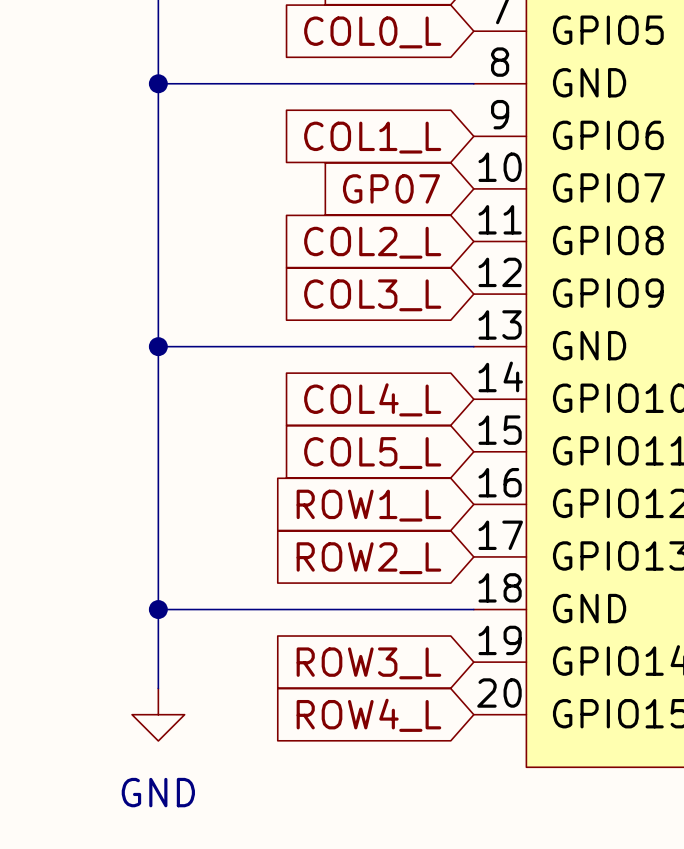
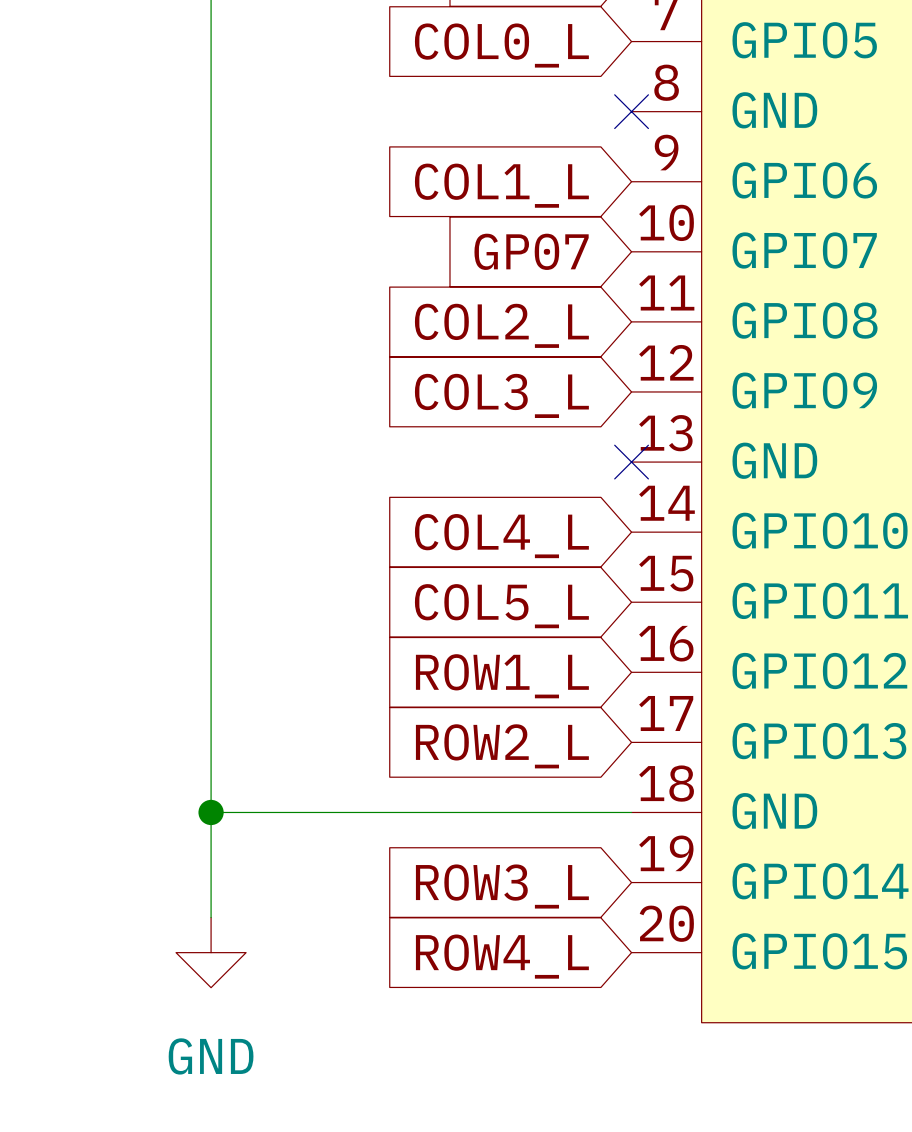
wire: (158, 83) (473, 83) -> none
junction: (158, 83) -> none
no-connect mark: none -> (631, 111)
wire: (158, 346) (473, 346) -> none
junction: (158, 346) -> none
no-connect mark: none -> (631, 462)

